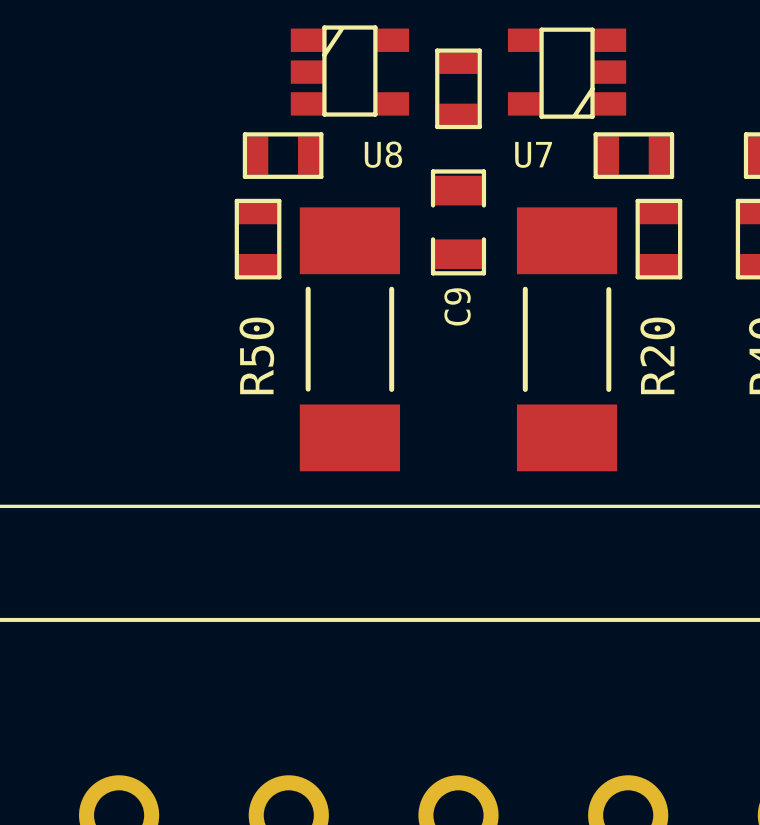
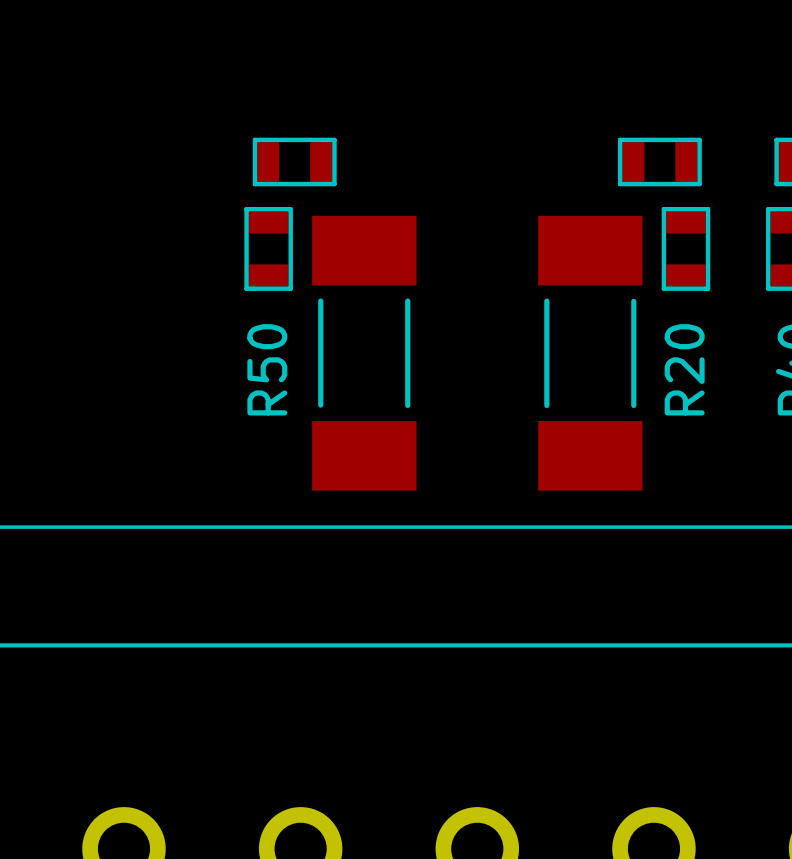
U8: (349, 71) -> none
U7: (567, 73) -> none
part: (458, 88) -> none
C9: (458, 222) -> none

